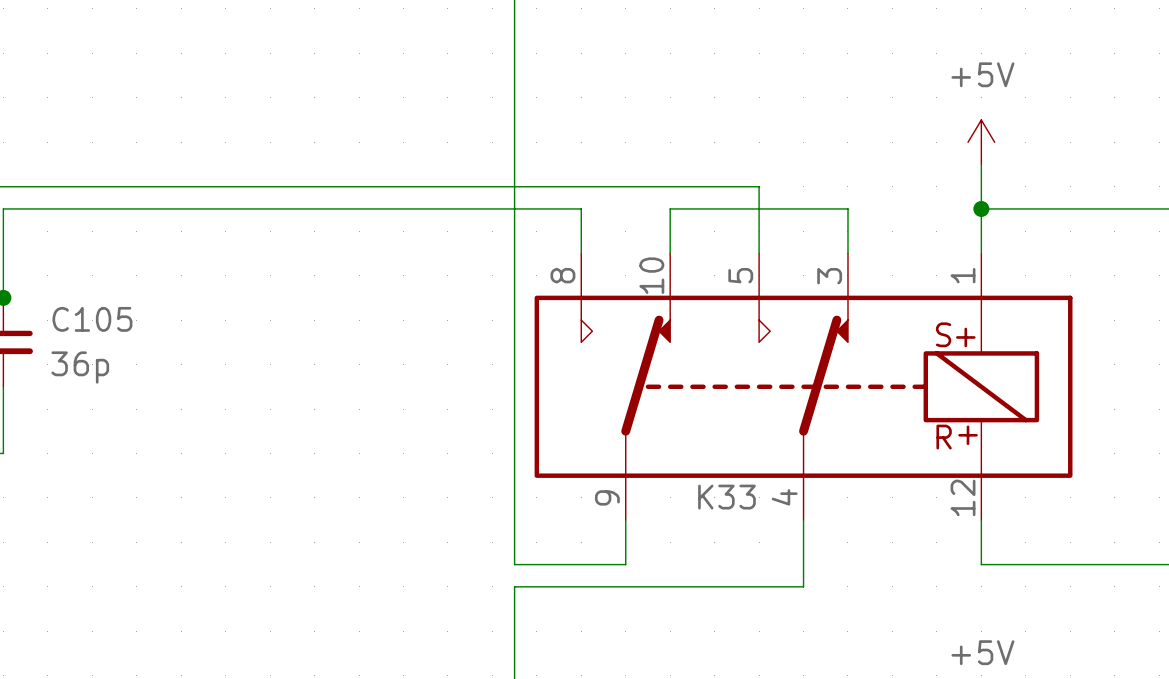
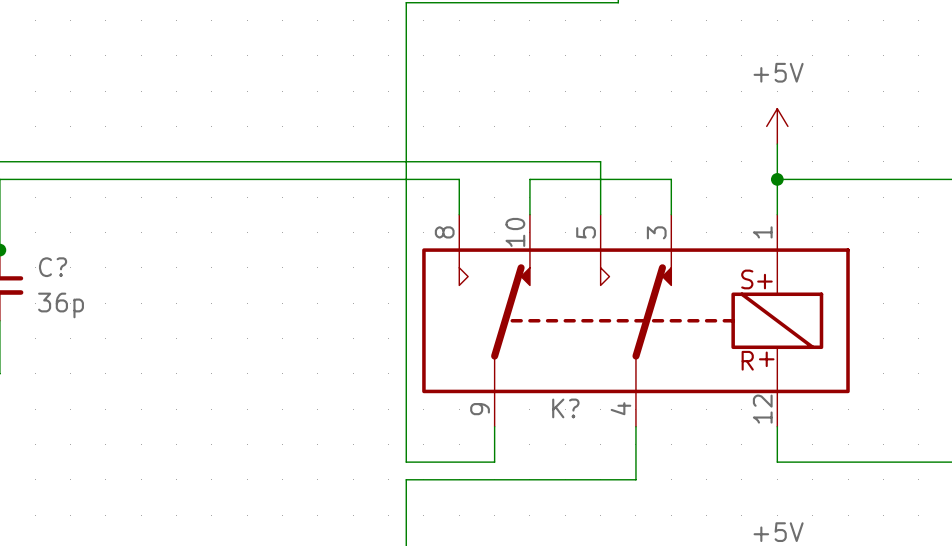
C105 name: C105 (92, 319) -> C? (53, 267)
K33 name: K33 (726, 497) -> K? (565, 408)

